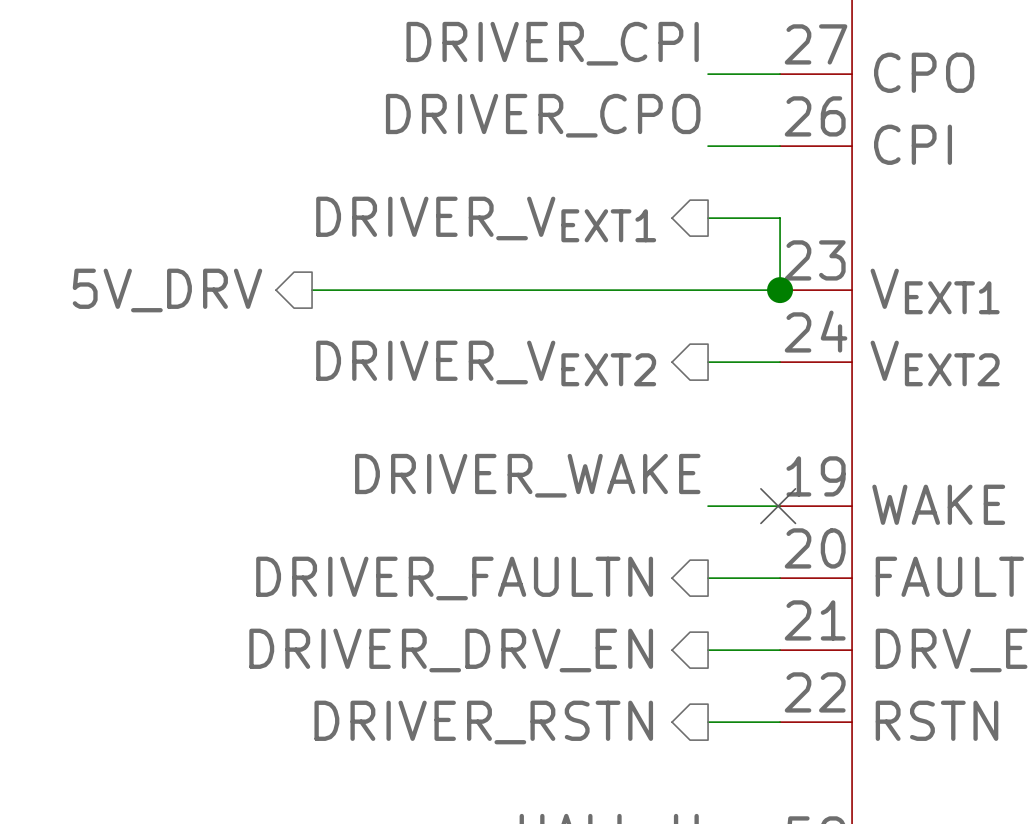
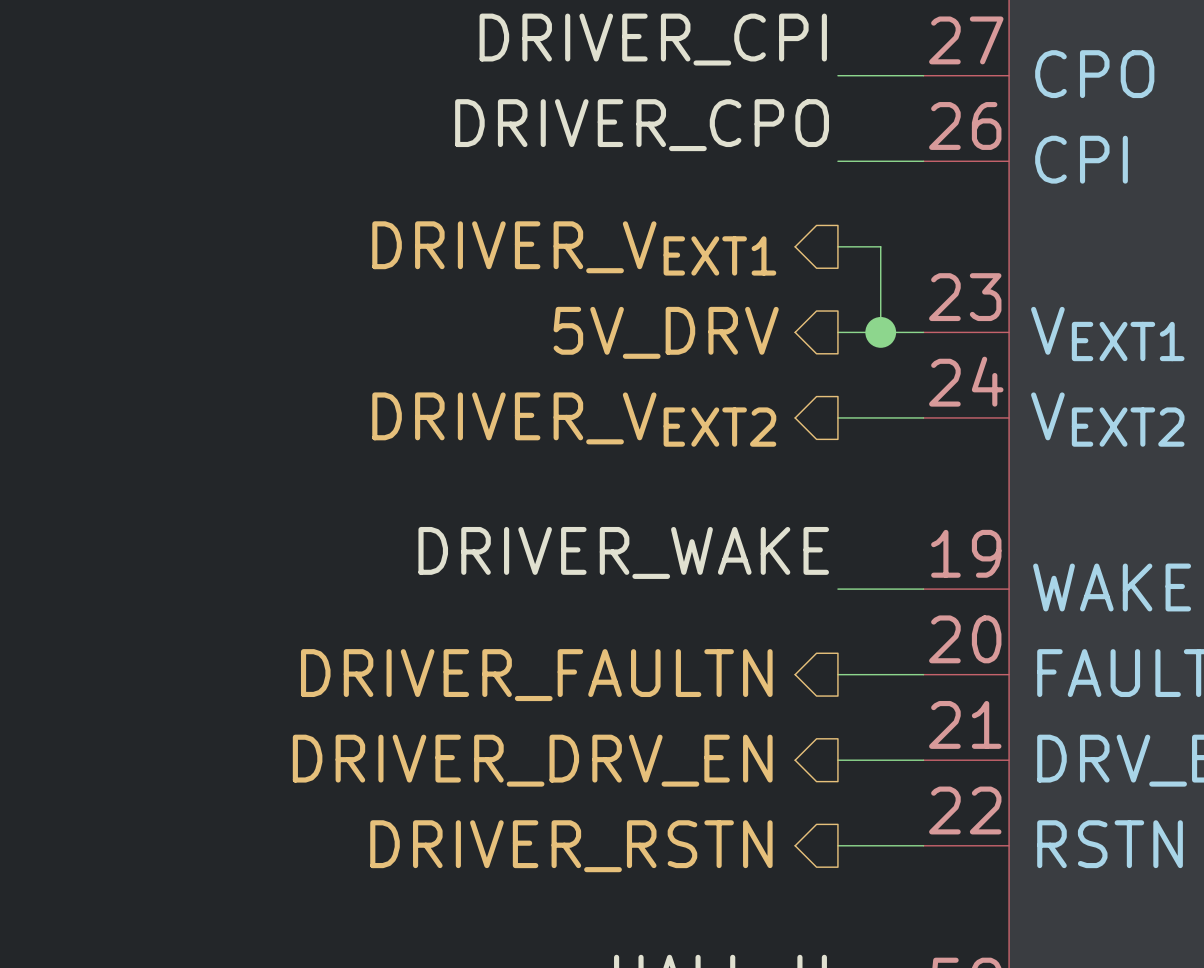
wire: (744, 218) (780, 218) (780, 290) -> (880, 246) (880, 332)
hierarchical label position: 5V_DRV (167, 290) -> 5V_DRV (666, 332)
wire: (312, 290) (708, 290) -> none
junction position: (780, 290) -> (880, 332)
no-connect mark: (778, 506) -> none

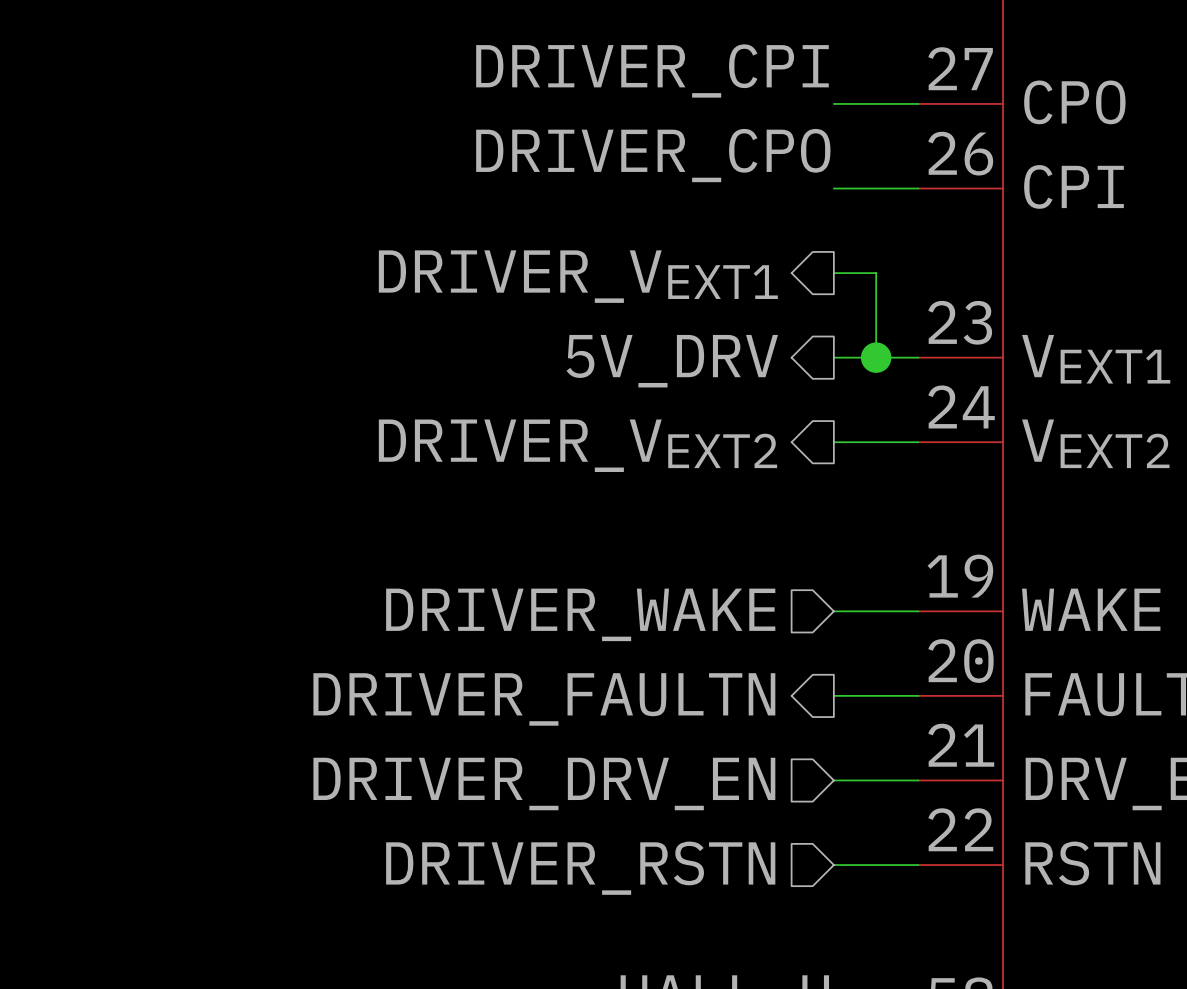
label: DRIVER_WAKE (623, 552) -> none
hierarchical label: none -> DRIVER_WAKE (580, 614)
hierarchical label shape: output (532, 760) -> input (544, 784)
hierarchical label shape: output (571, 846) -> input (580, 868)

